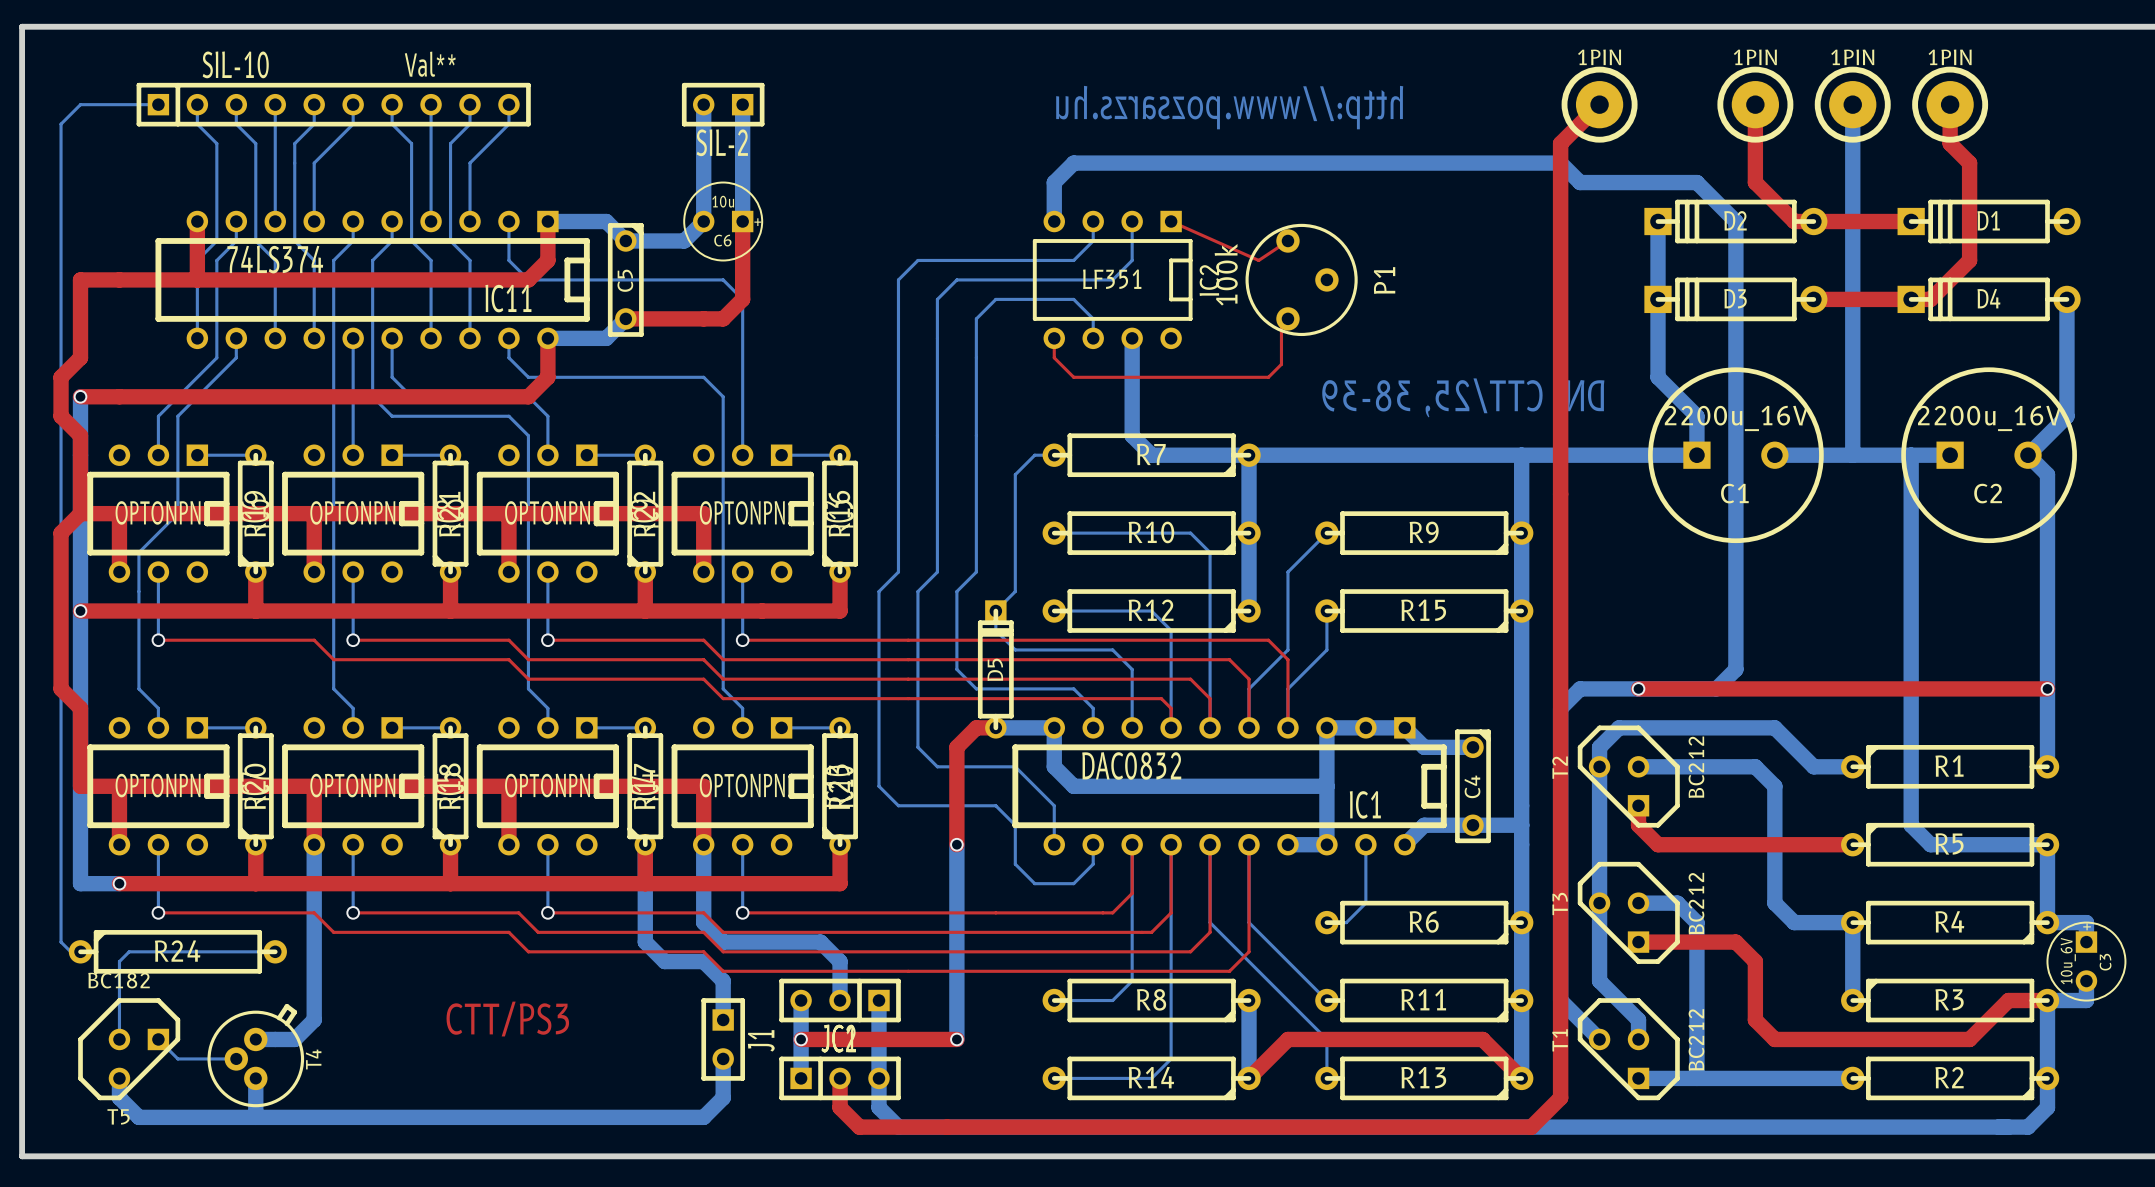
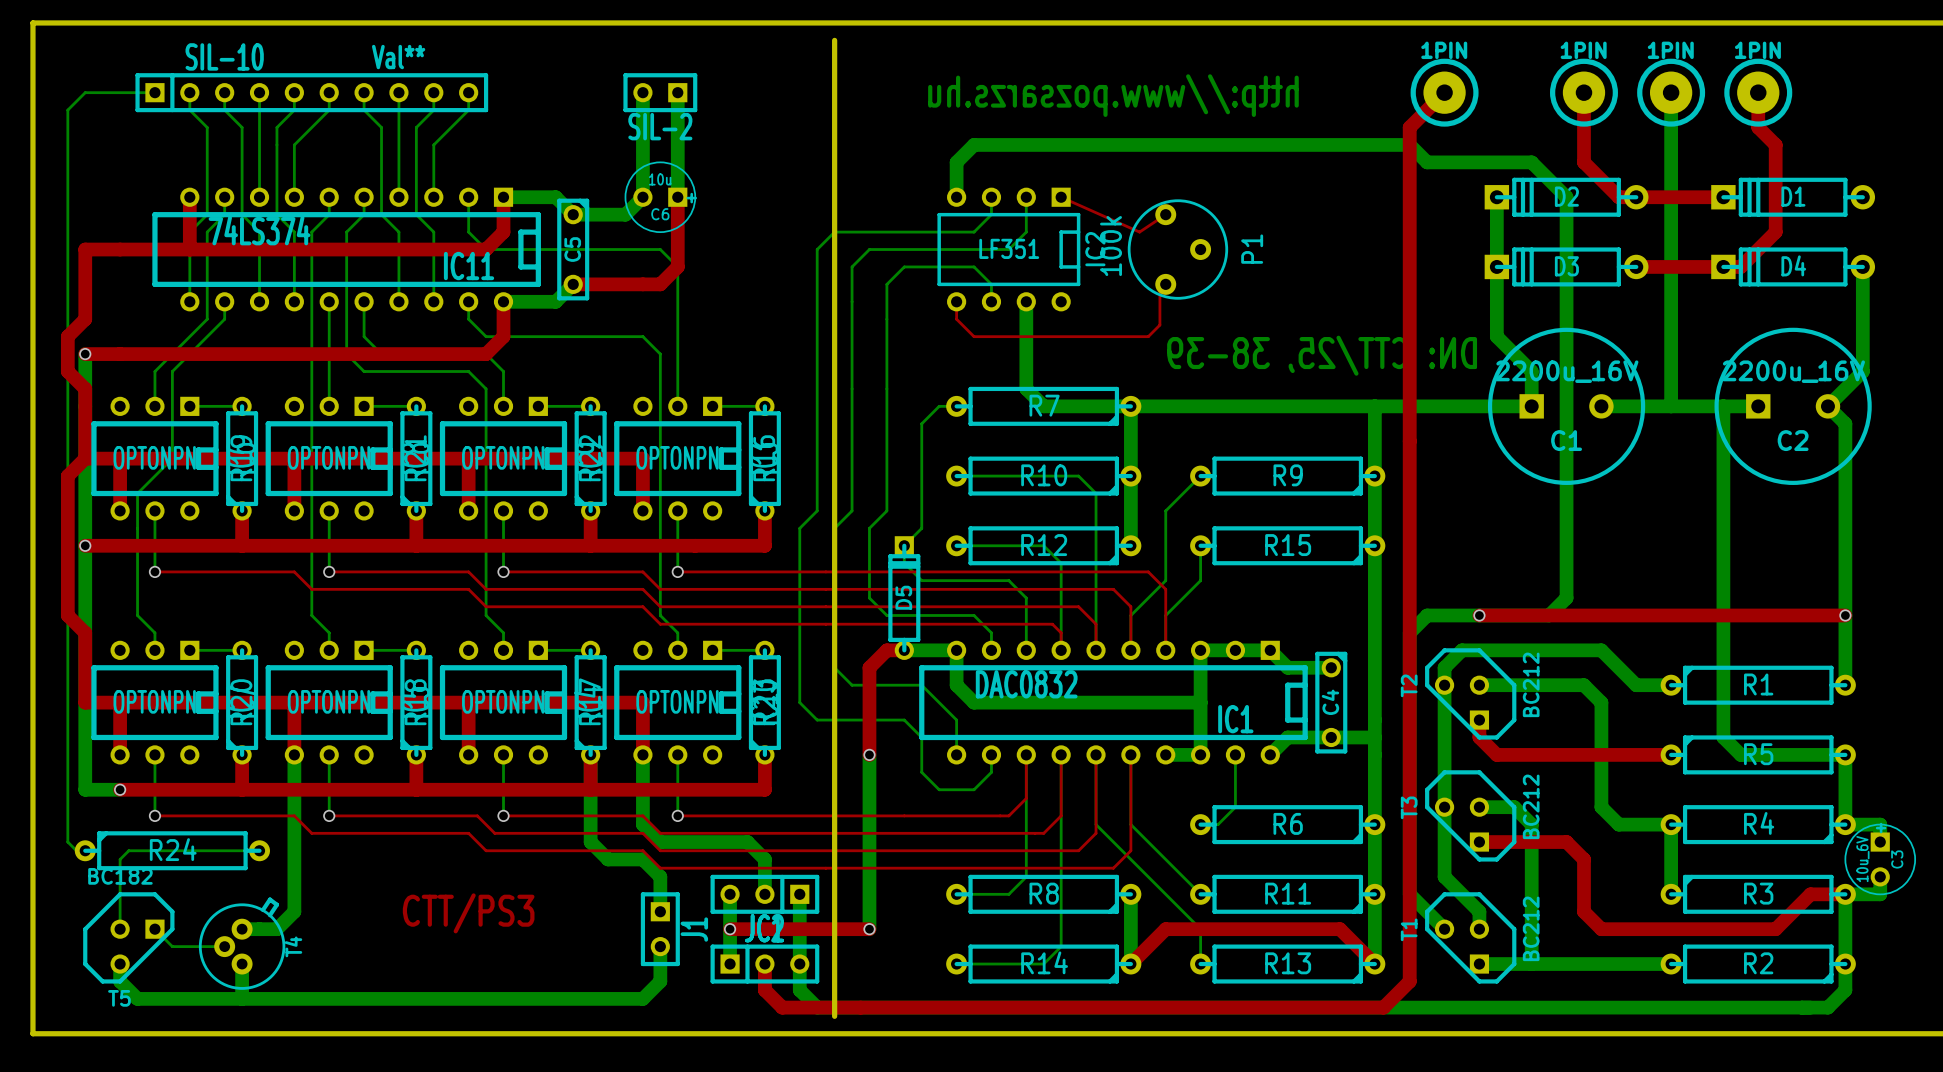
board edge: none -> (834, 40) (834, 1016)

